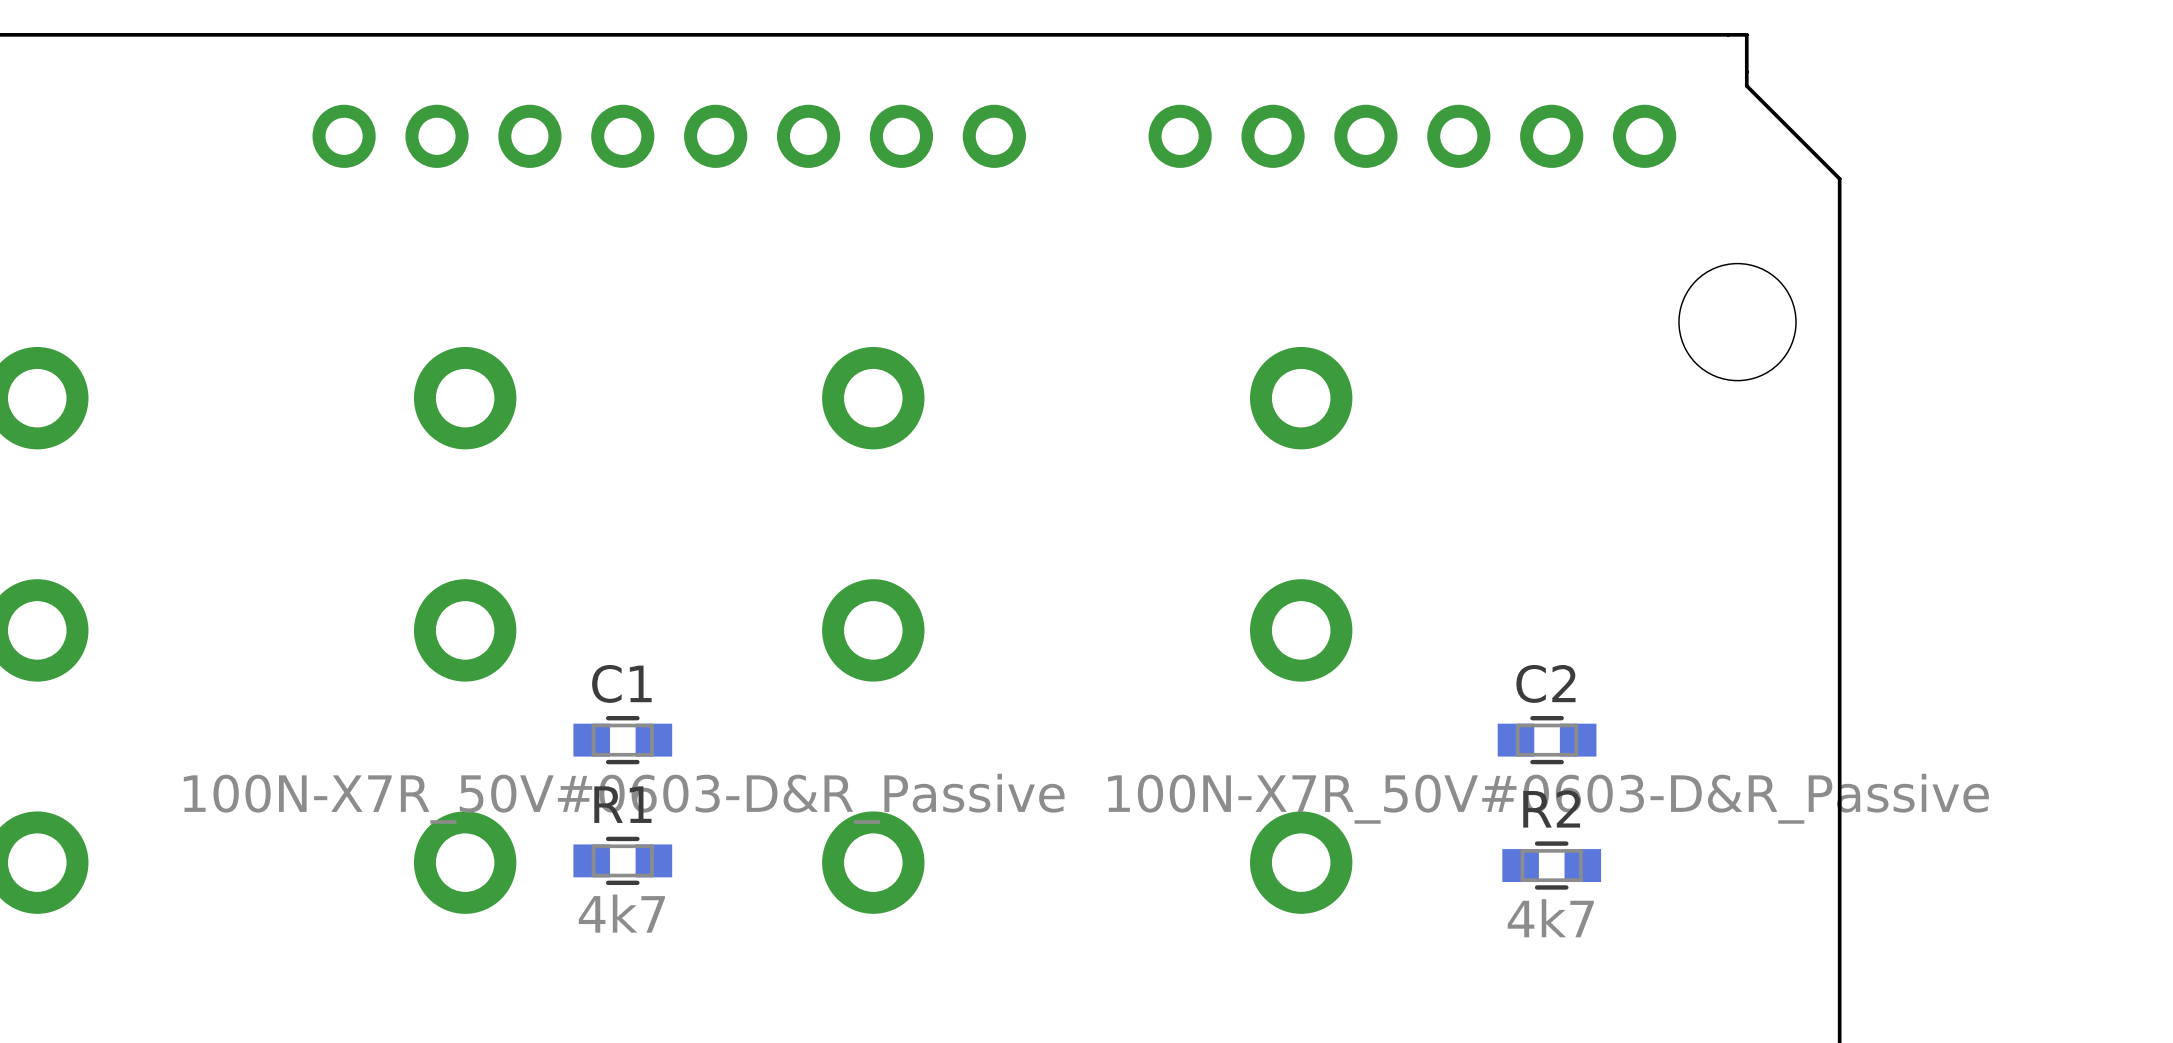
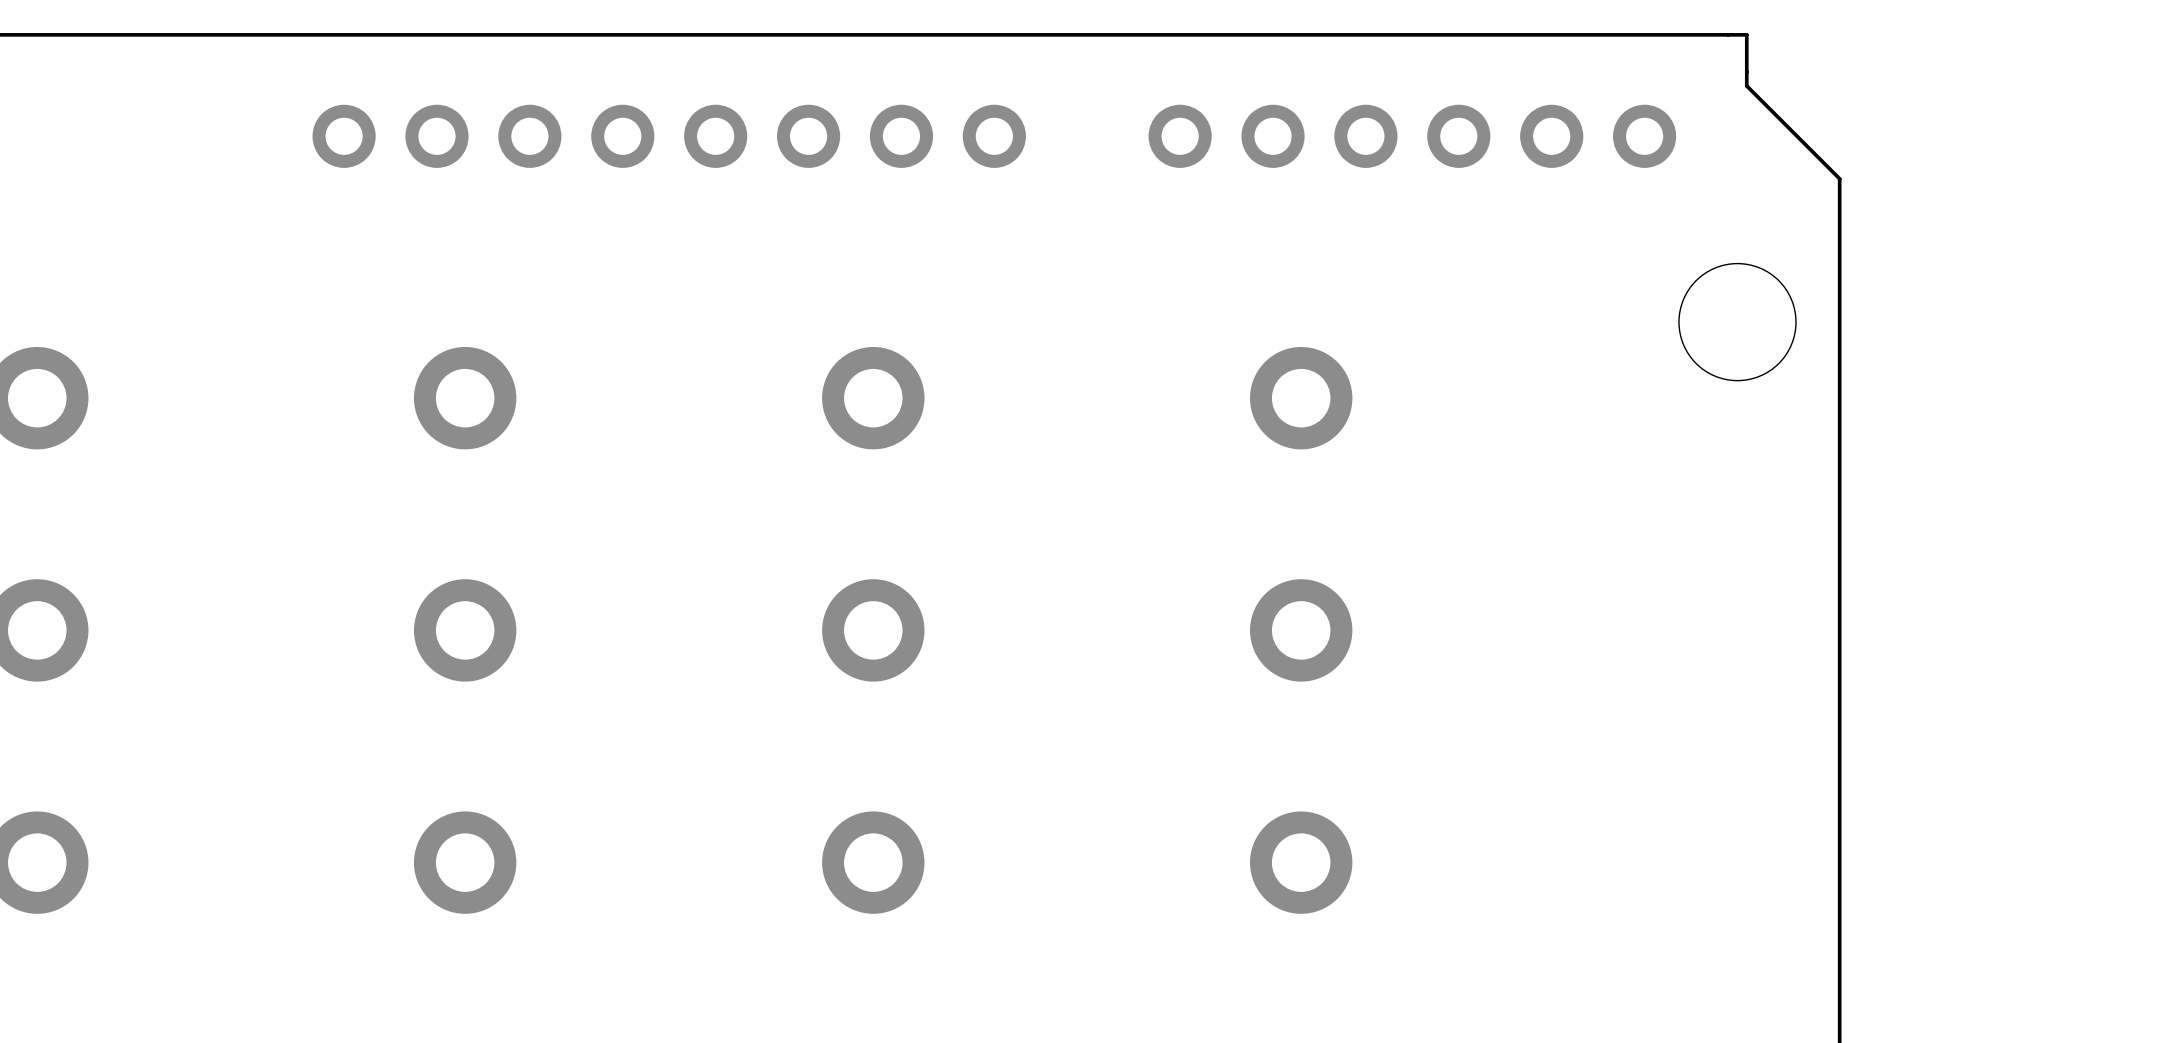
C1: 100N-X7R_50V#0603-D&R_Passive (622, 740) -> none
C2: 100N-X7R_50V#0603-D&R_Passive (1547, 740) -> none
R1: 4k7 (622, 860) -> none
R2: 4k7 (1551, 865) -> none

